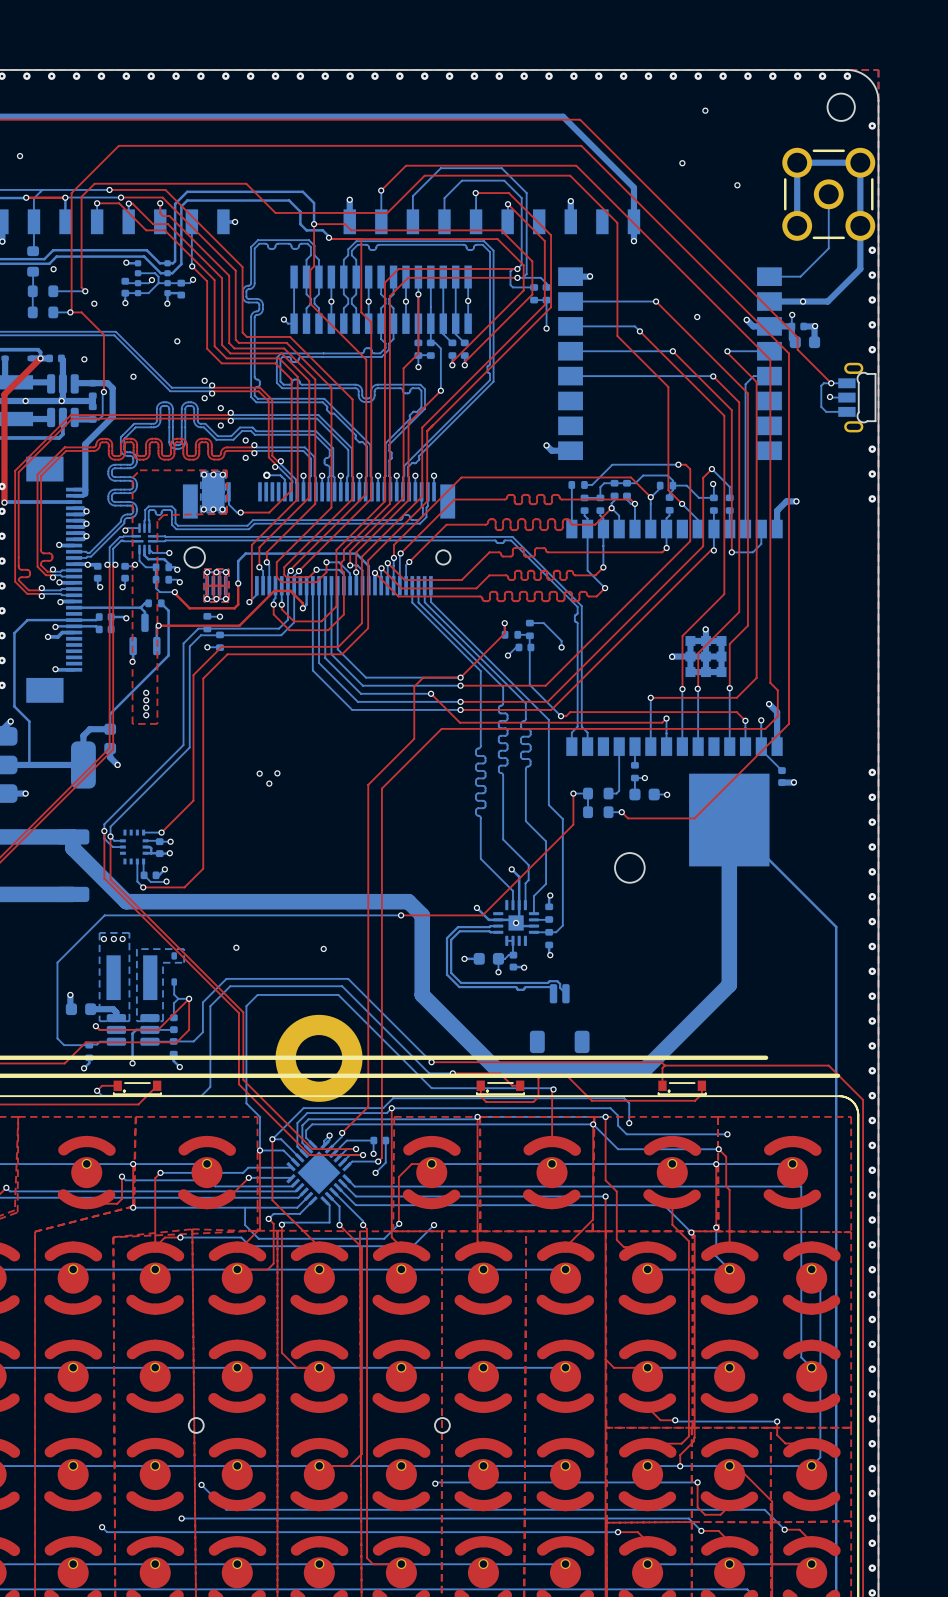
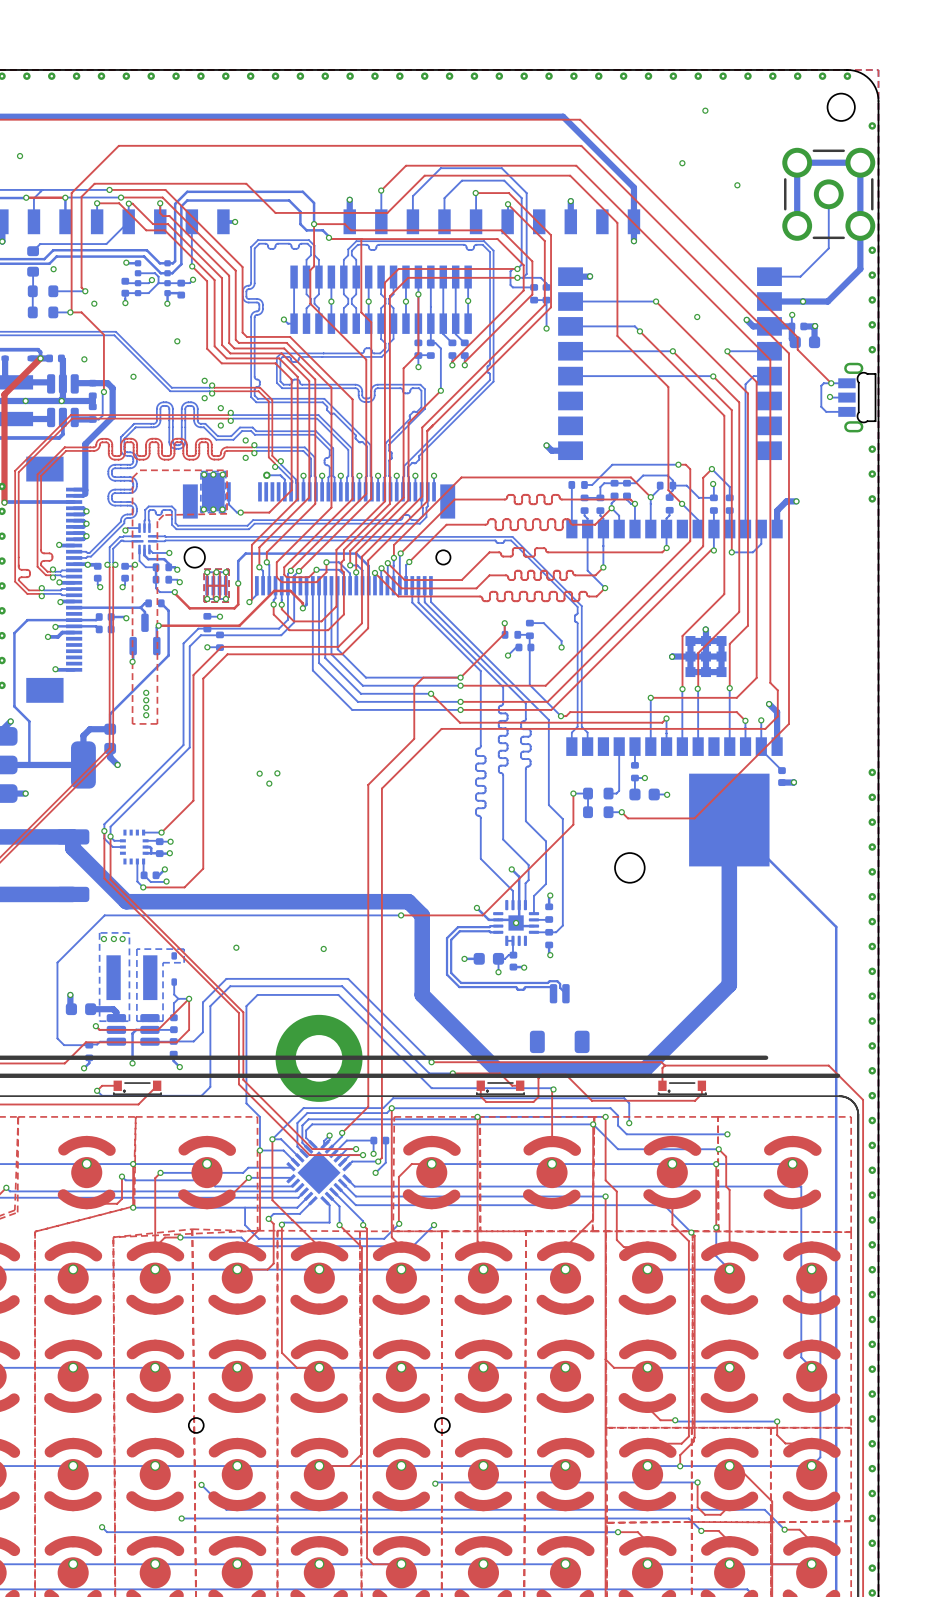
bottom track: (33, 221) (33, 250) -> (128, 221) (106, 244) (40, 244) (33, 250)

